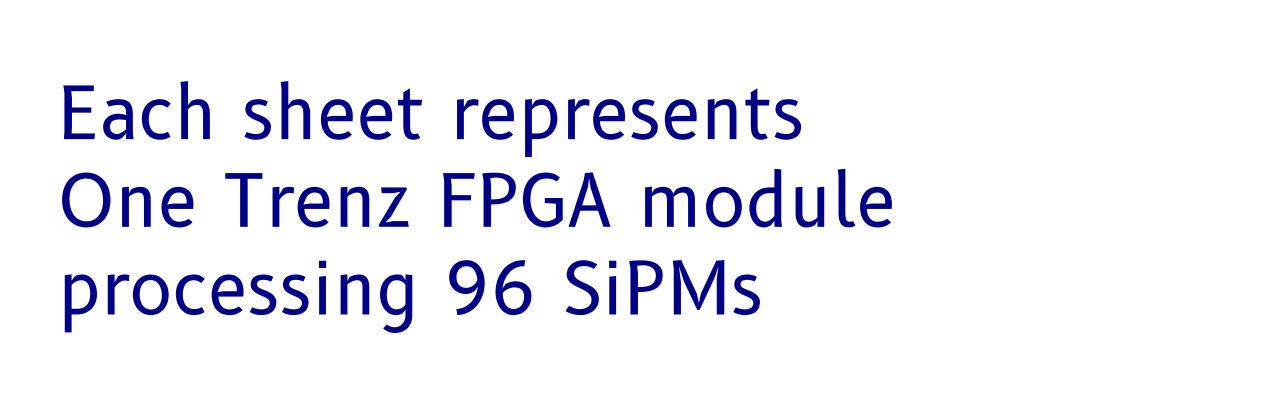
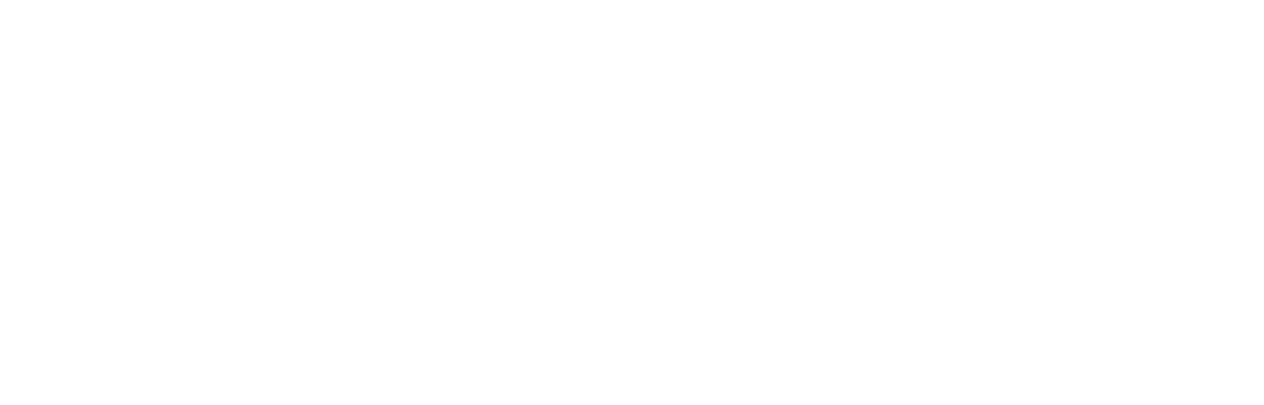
text: Each sheet represents (432, 119) -> none
text: One Trenz FPGA module (476, 198) -> none
text: processing 96 SiPMs (412, 296) -> none

